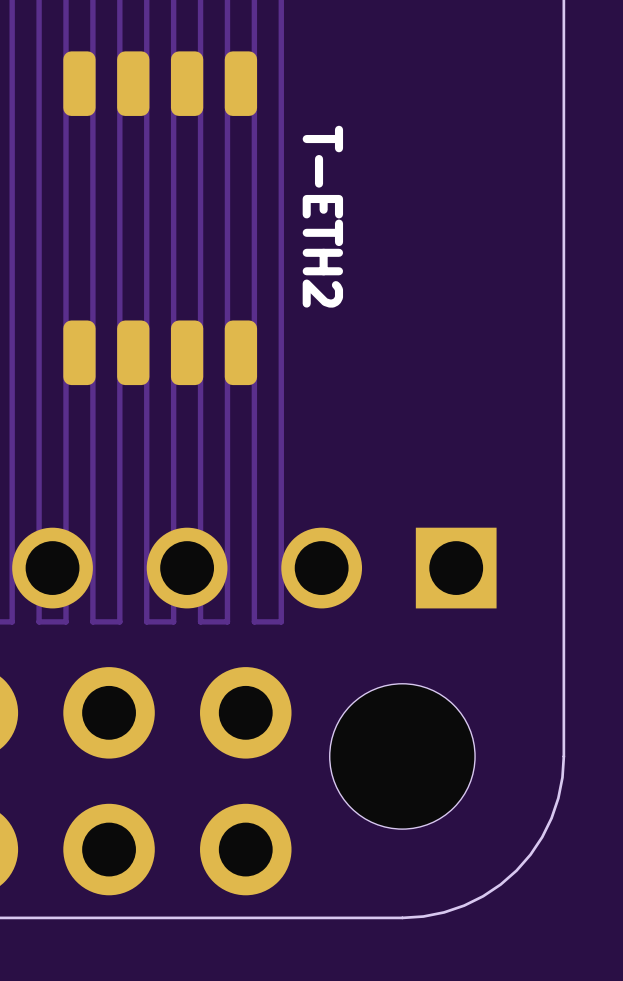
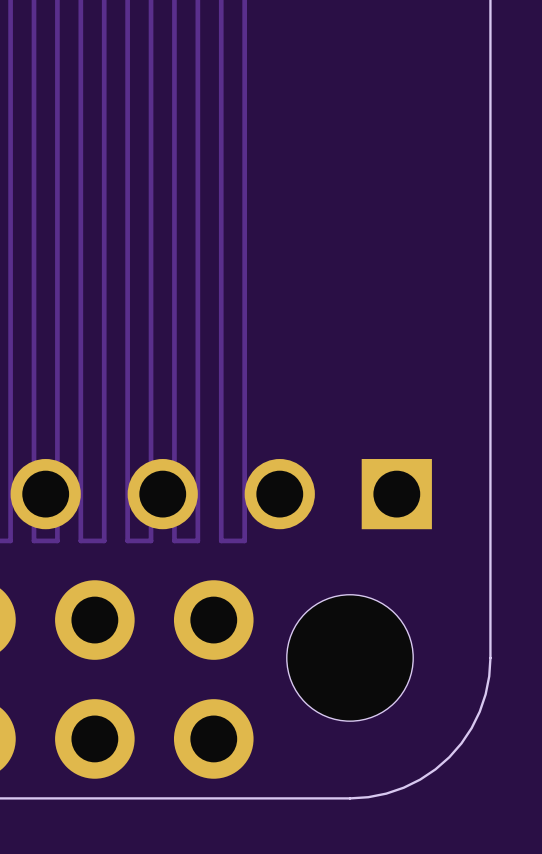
T-ETH2: (160, 218) -> none

